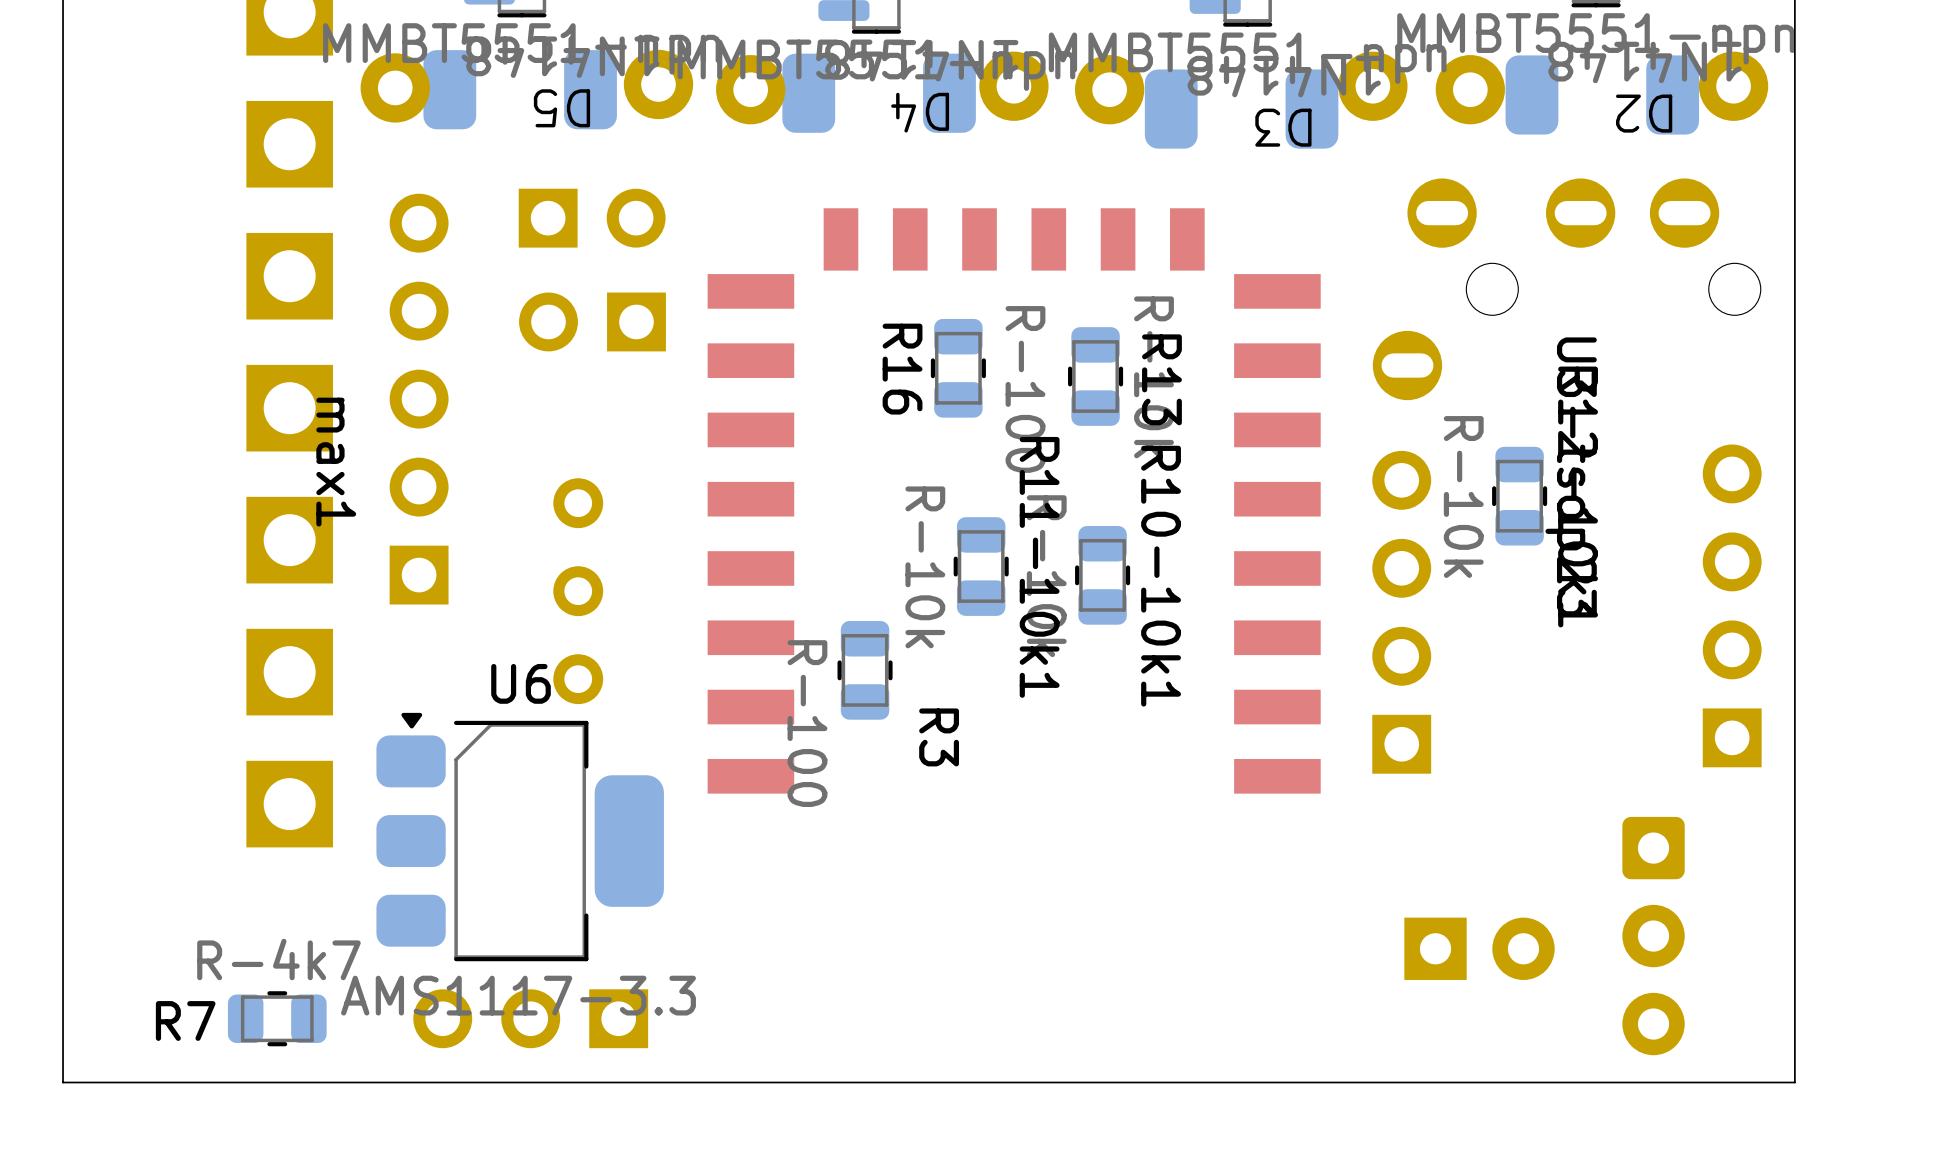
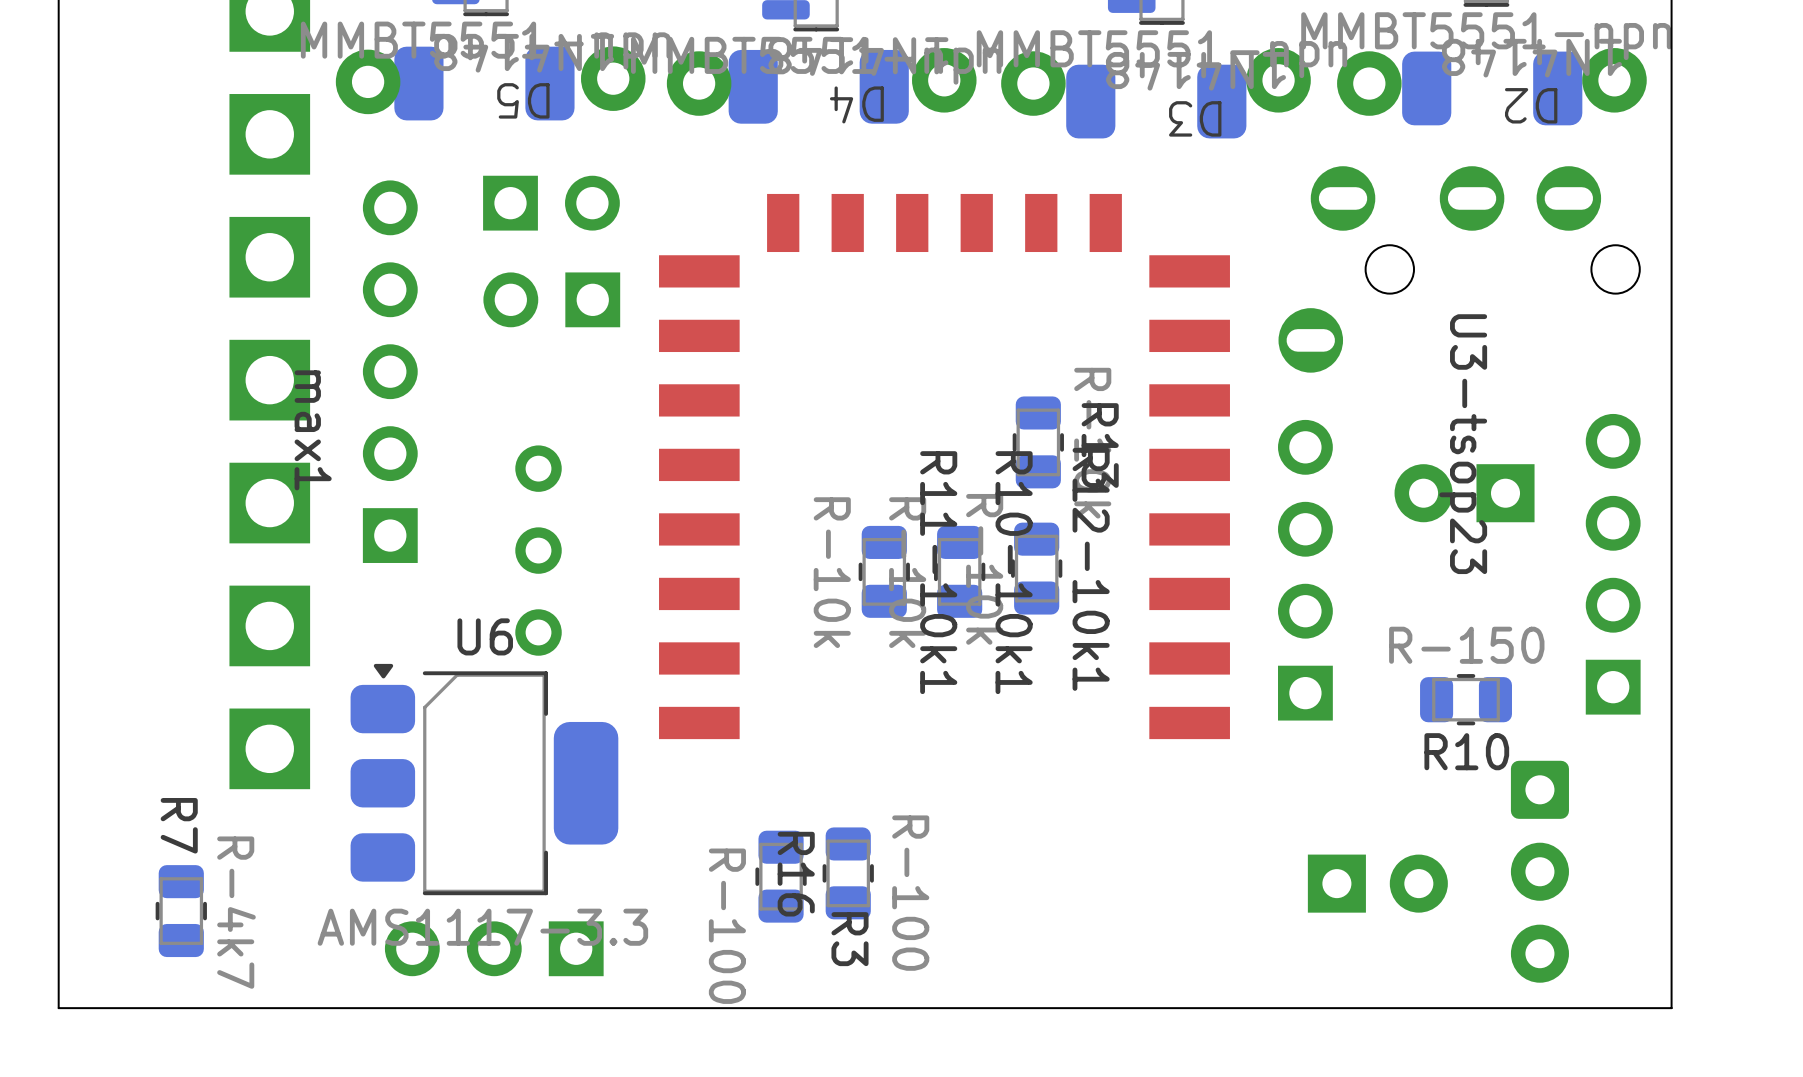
R16 position: (958, 368) -> (848, 873)
R13 position: (1095, 376) -> (1038, 442)
R12-10k1 position: (1519, 496) -> (1036, 568)
part: none -> (1464, 493)
R11-10k1 position: (981, 566) -> (884, 571)
R10-10k1 position: (1102, 575) -> (959, 571)
R3 position: (865, 670) -> (781, 876)
R10: none -> R-150 (1466, 699)
R7 rotation: 0° (277, 1018) -> 90° clockwise (181, 911)
R7 position: (277, 1018) -> (181, 911)

